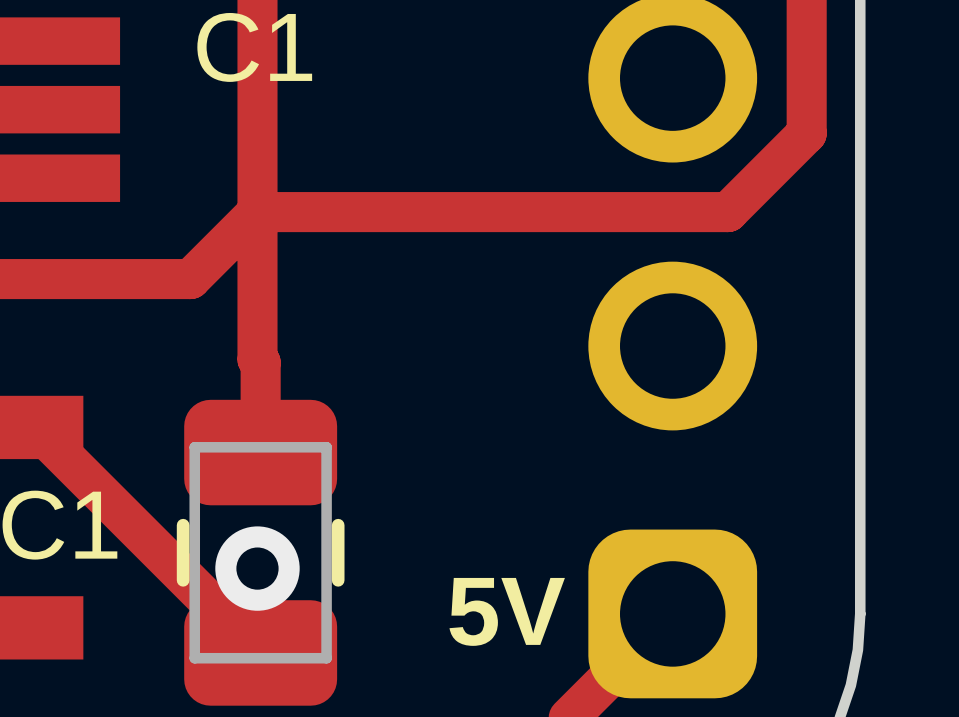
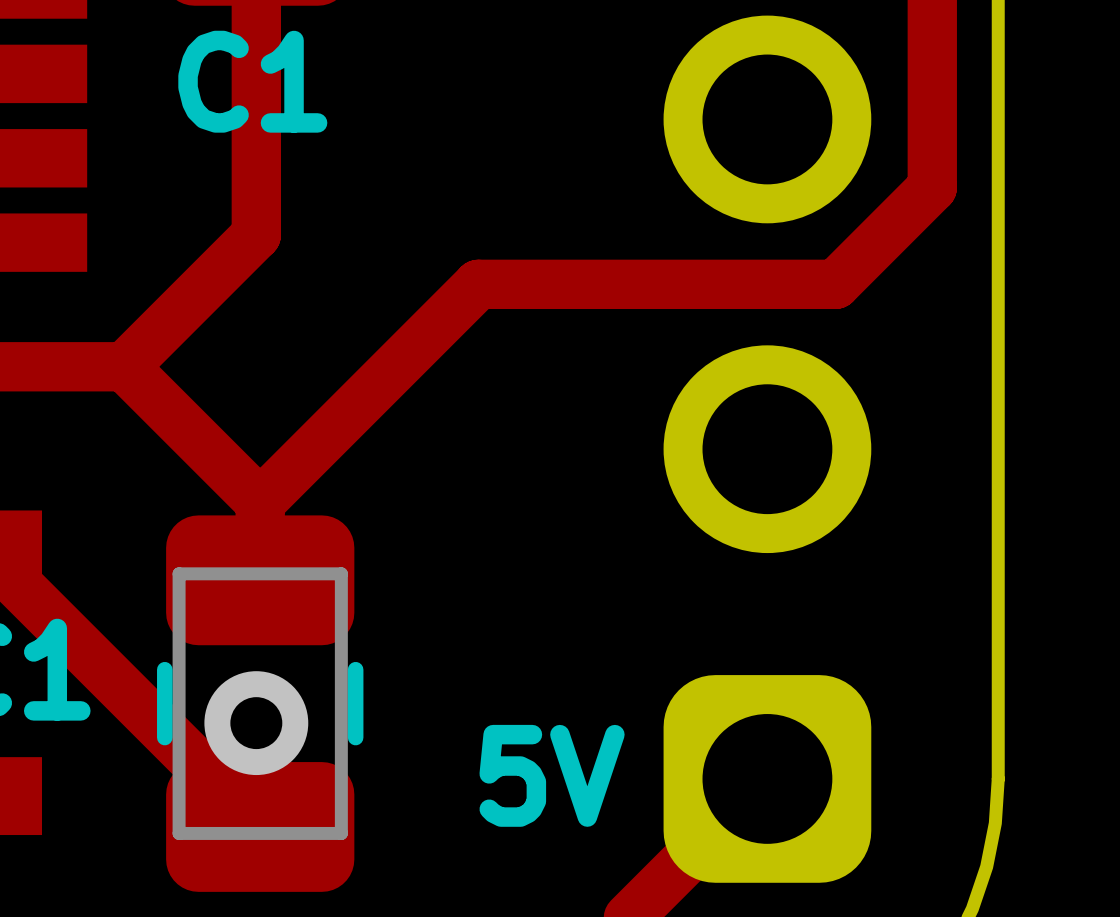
track: (257, 171) (257, 359) (260, 362) (260, 389) -> none
track: (437, 212) (257, 212) (190, 279) (150, 279) -> (478, 284) (260, 502) (124, 366) (256, 234)

